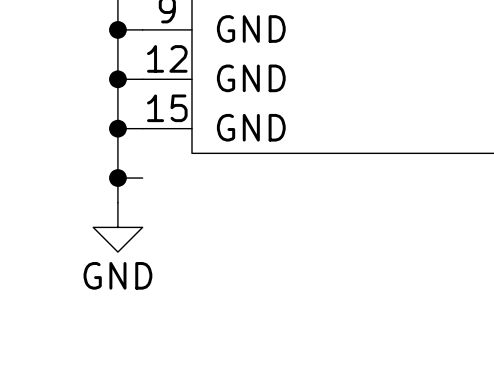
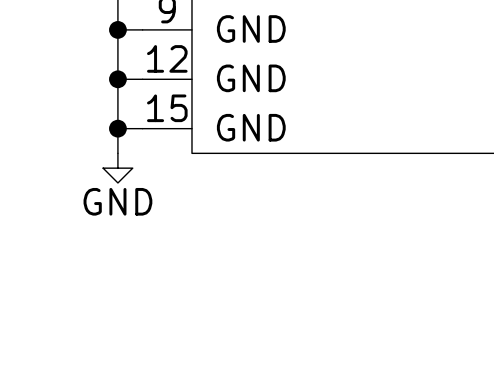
power symbol: none -> GND (117, 168)
wire: (117, 178) (142, 178) -> none
junction: (117, 178) -> none
power symbol: GND (117, 227) -> none

